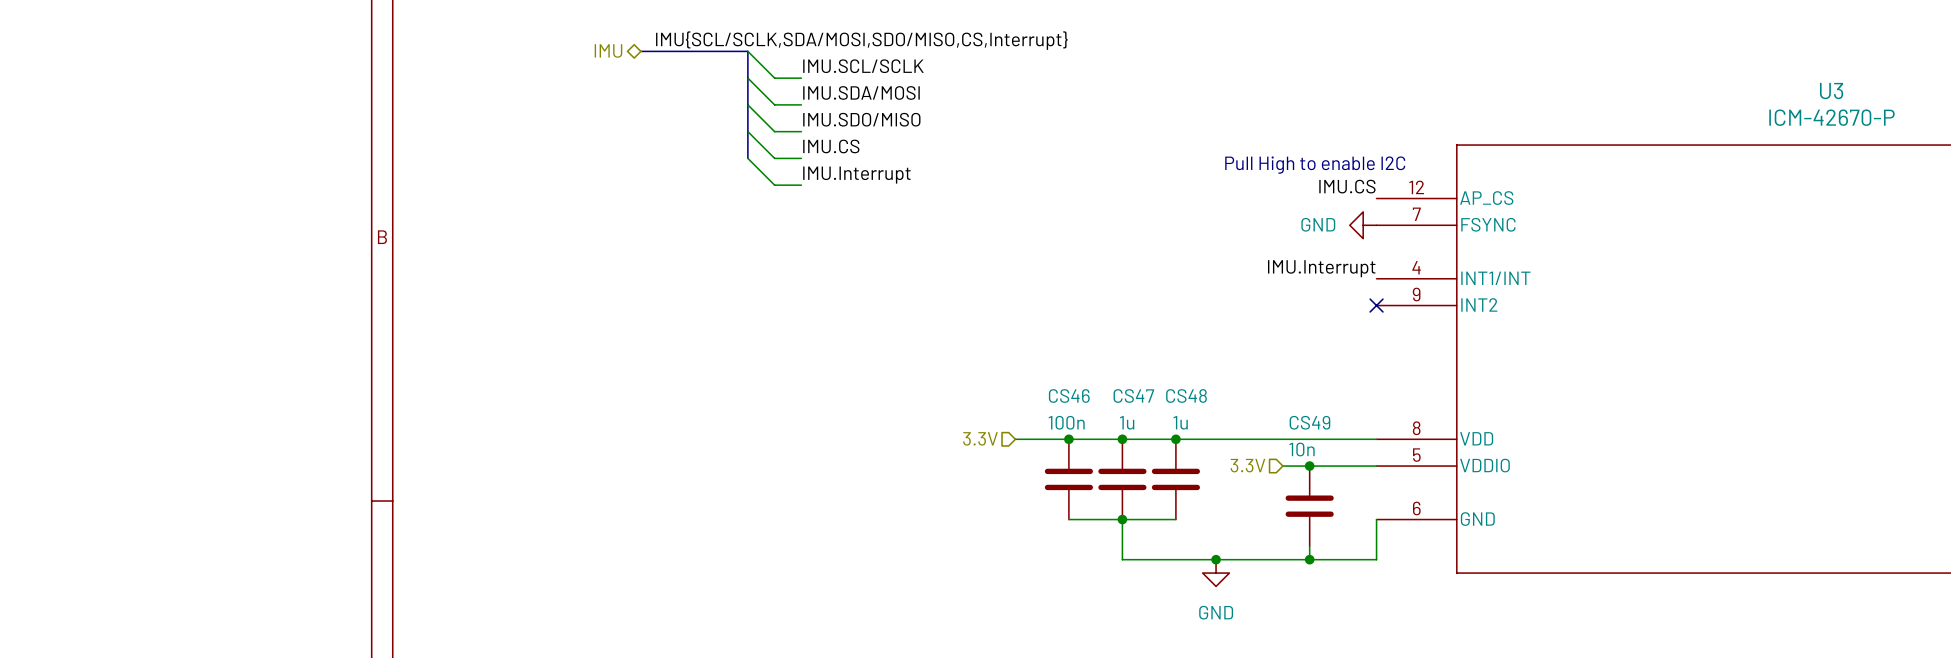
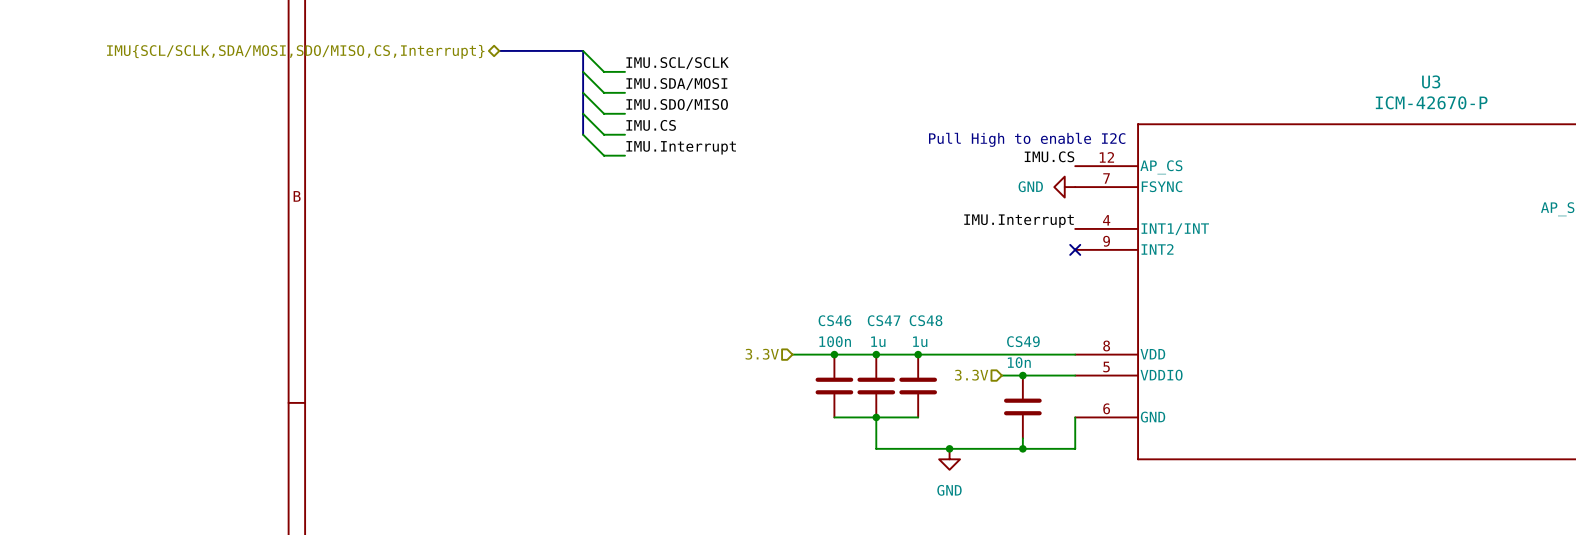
label: IMU{SCL/SCLK,SDA/MOSI,SDO/MISO,CS,Interrupt} (861, 40) -> none
hierarchical label: IMU (608, 50) -> IMU{SCL/SCLK,SDA/MOSI,SDO/MISO,CS,Interrupt} (295, 51)

